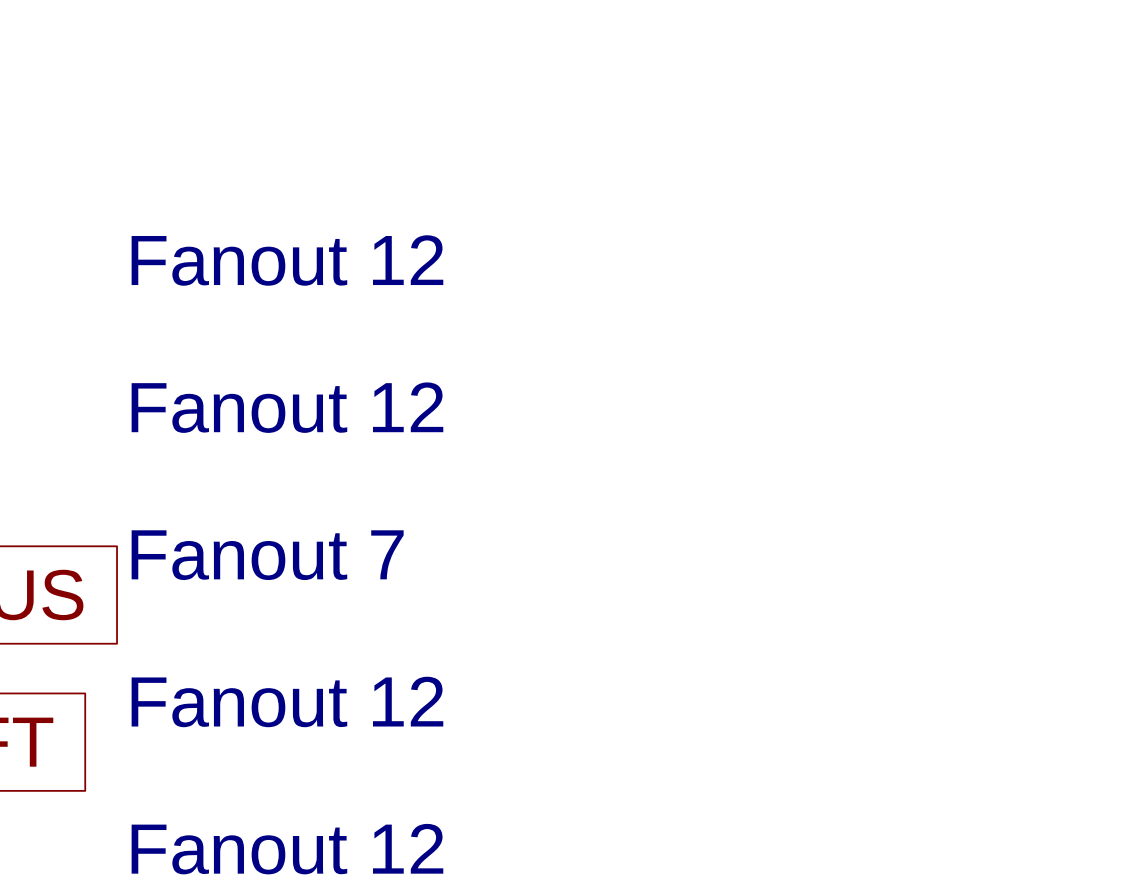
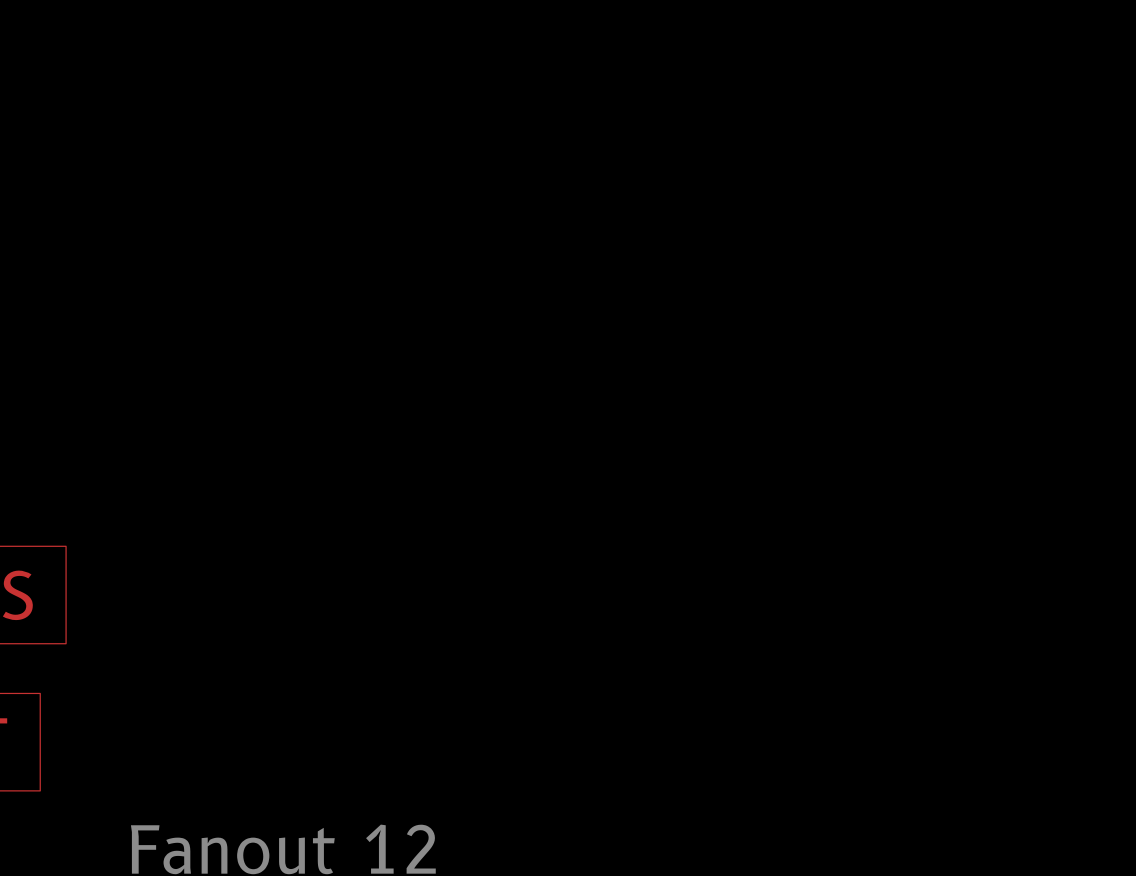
text: Fanout 12 (287, 260) -> none
text: Fanout 12 (287, 407) -> none
text: Fanout 7 (267, 555) -> none
text: Fanout 12 (287, 701) -> none

